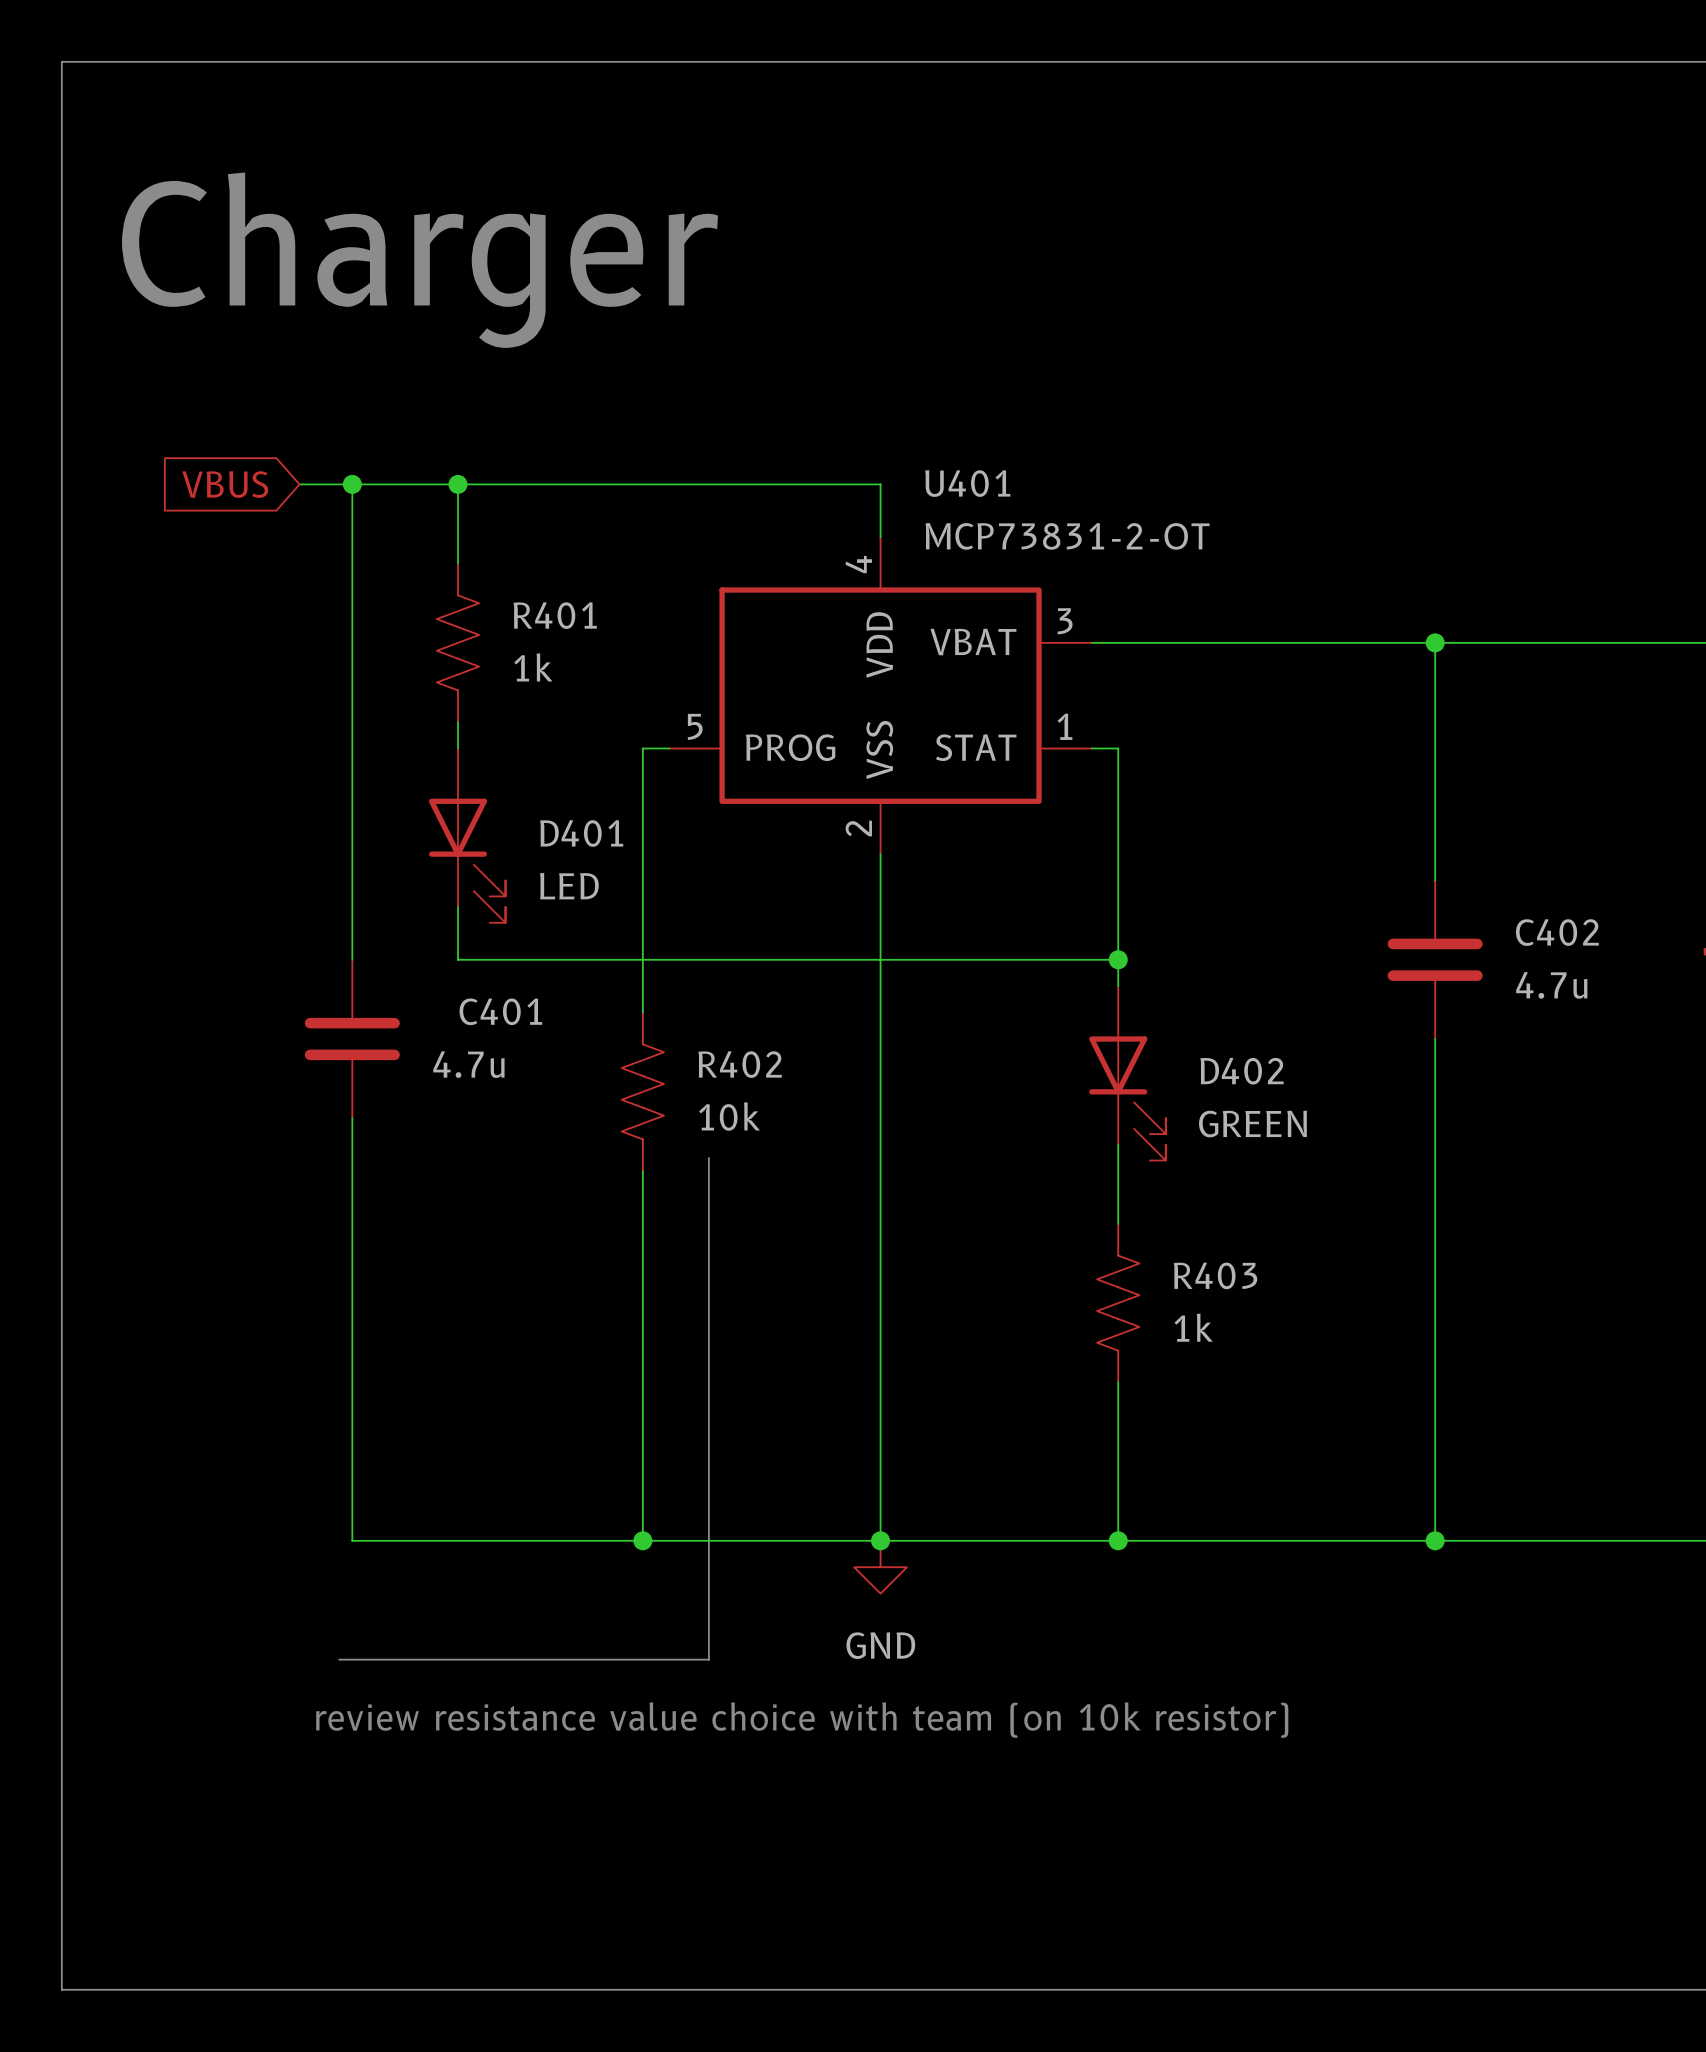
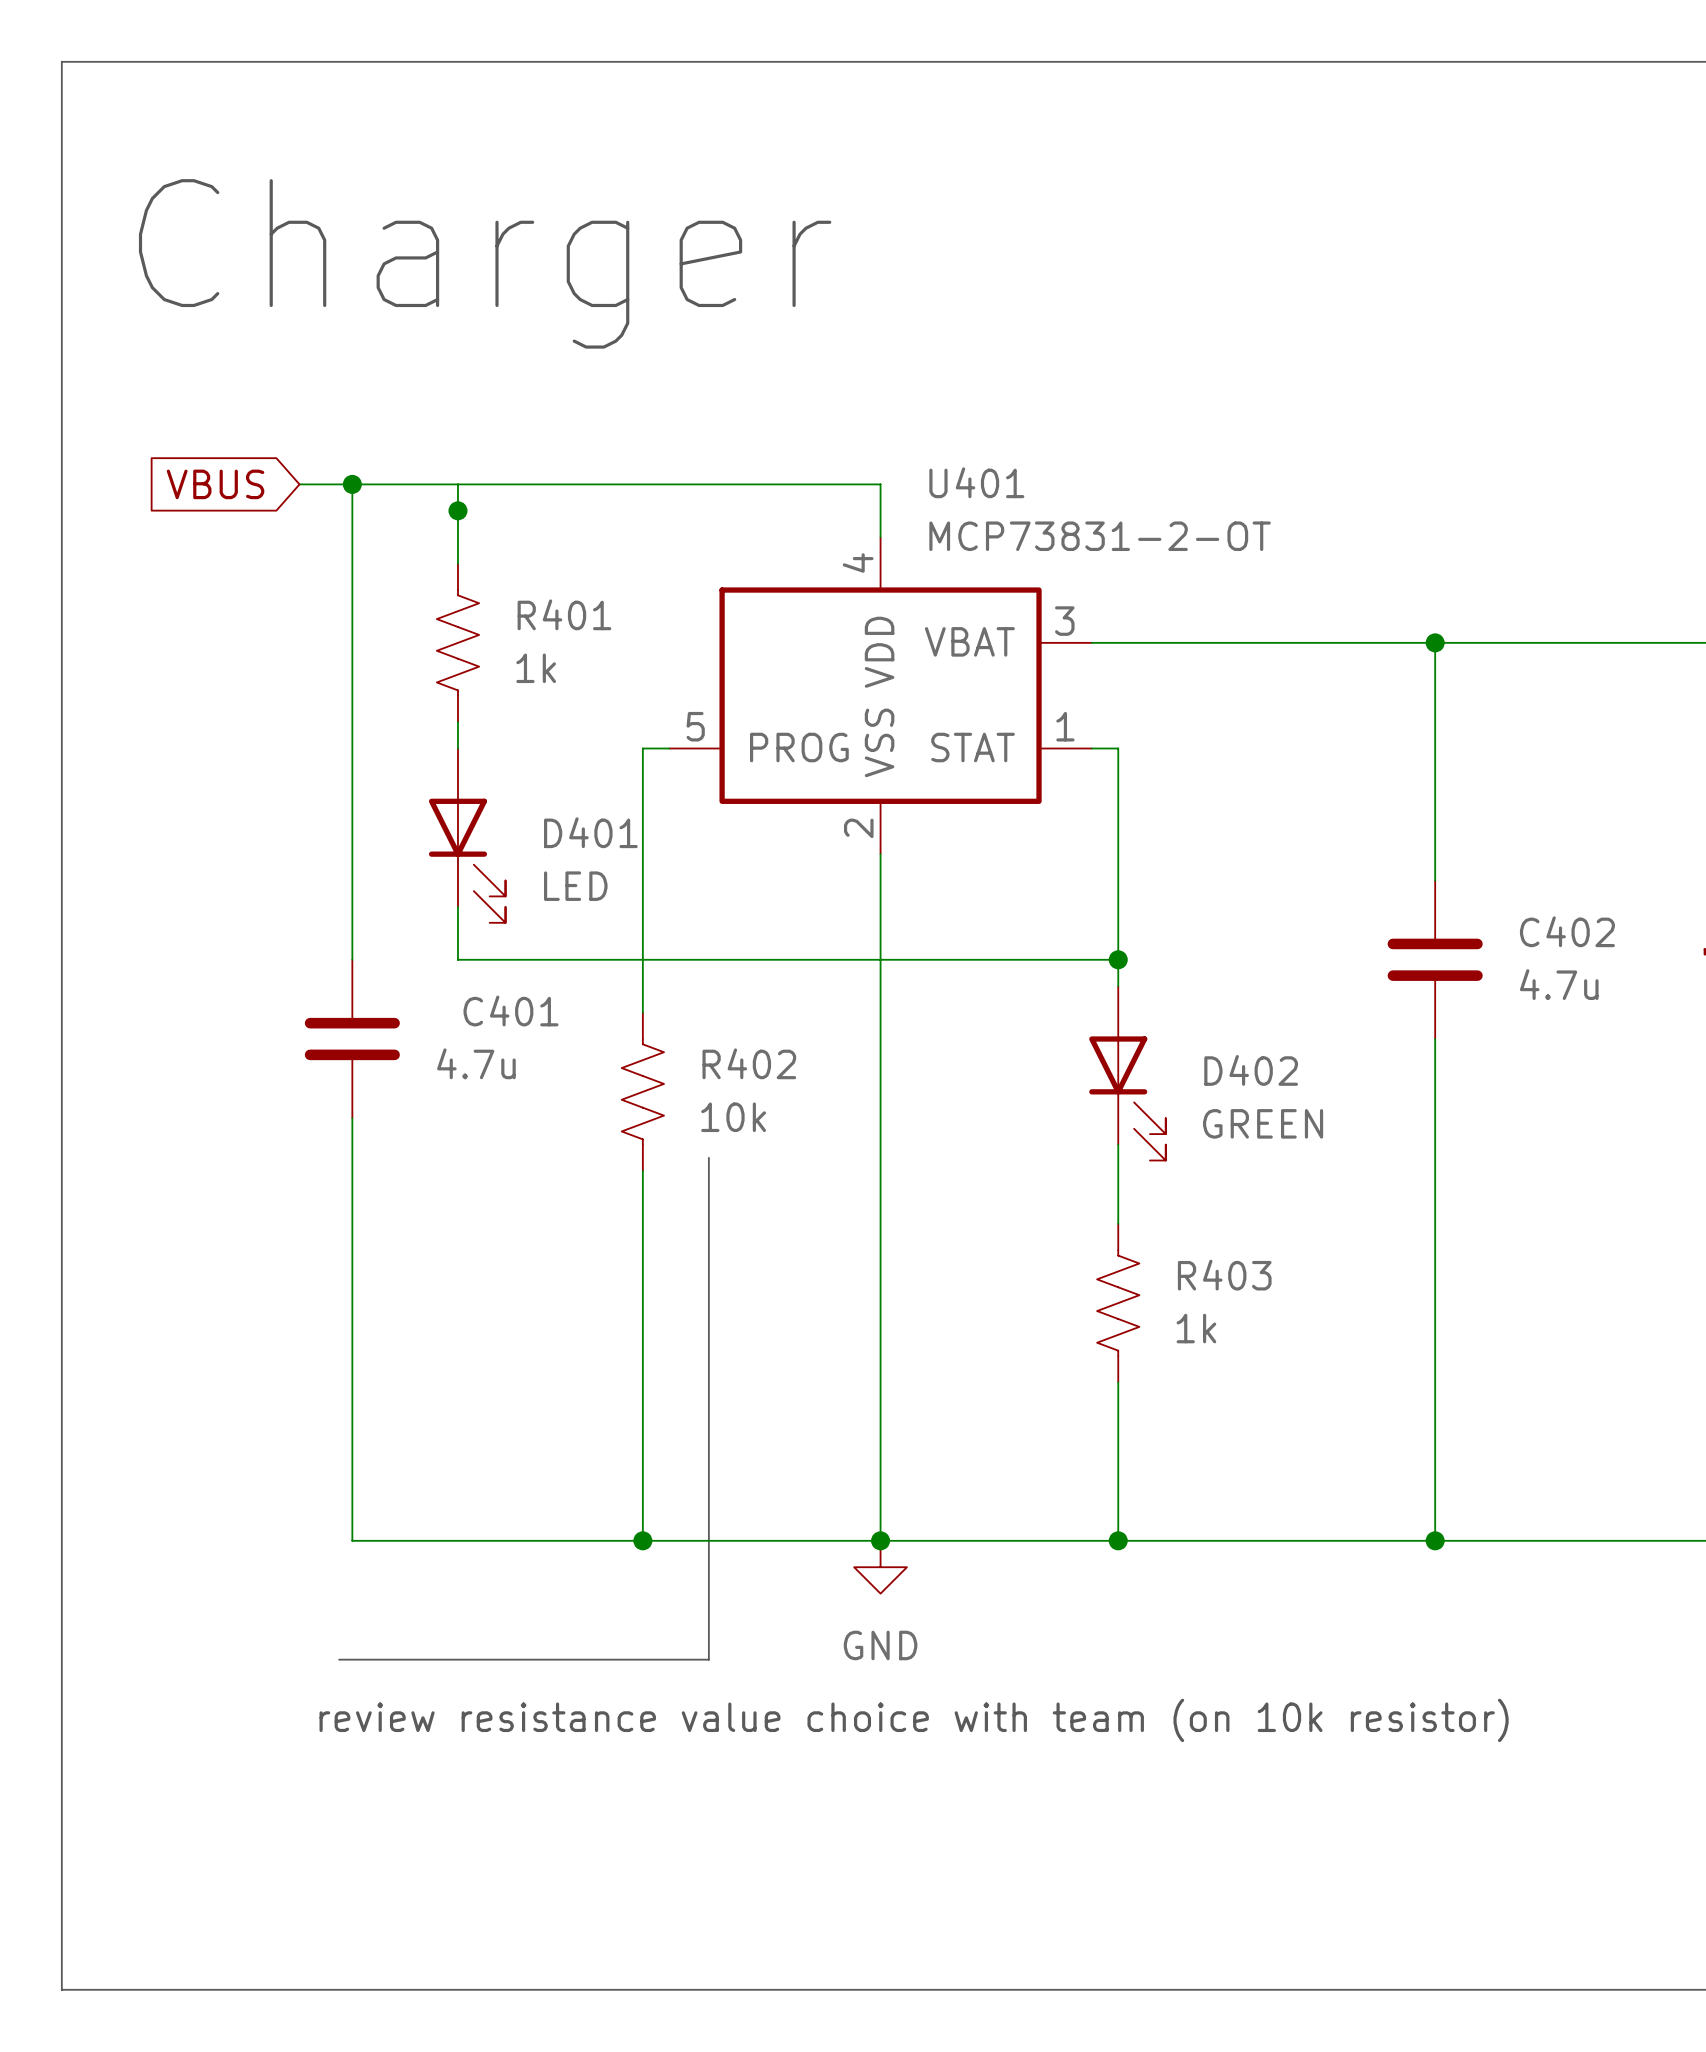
junction position: (457, 484) -> (457, 510)

